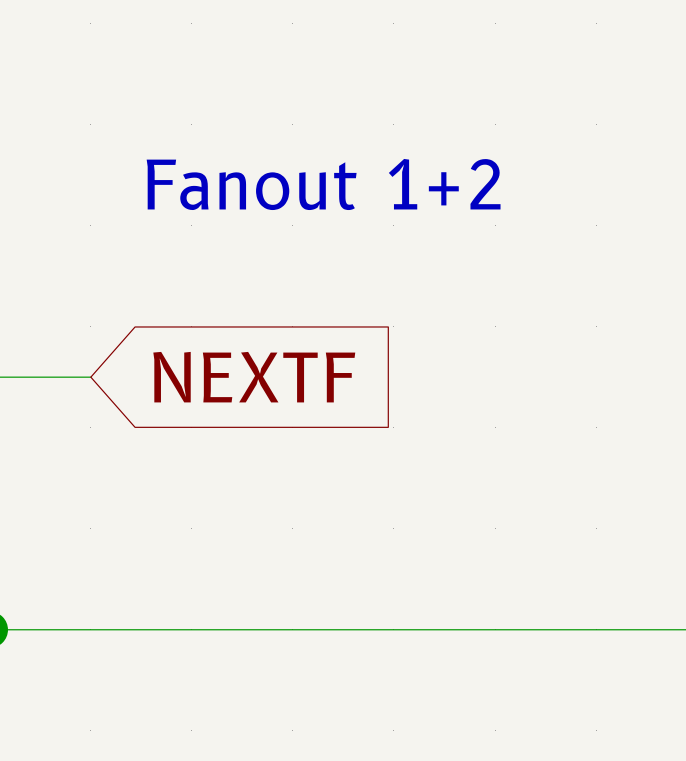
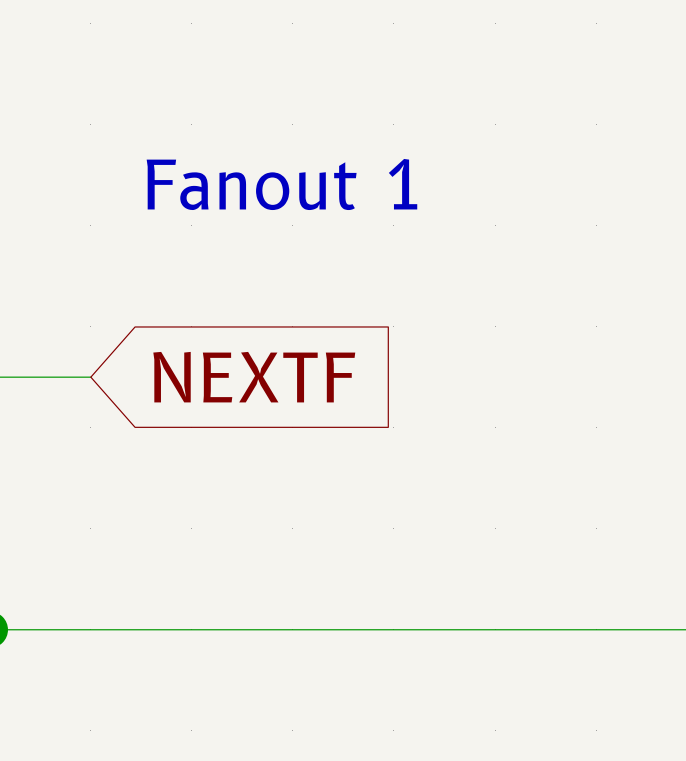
text: Fanout 1+2 (323, 184) -> Fanout 1 (281, 184)

